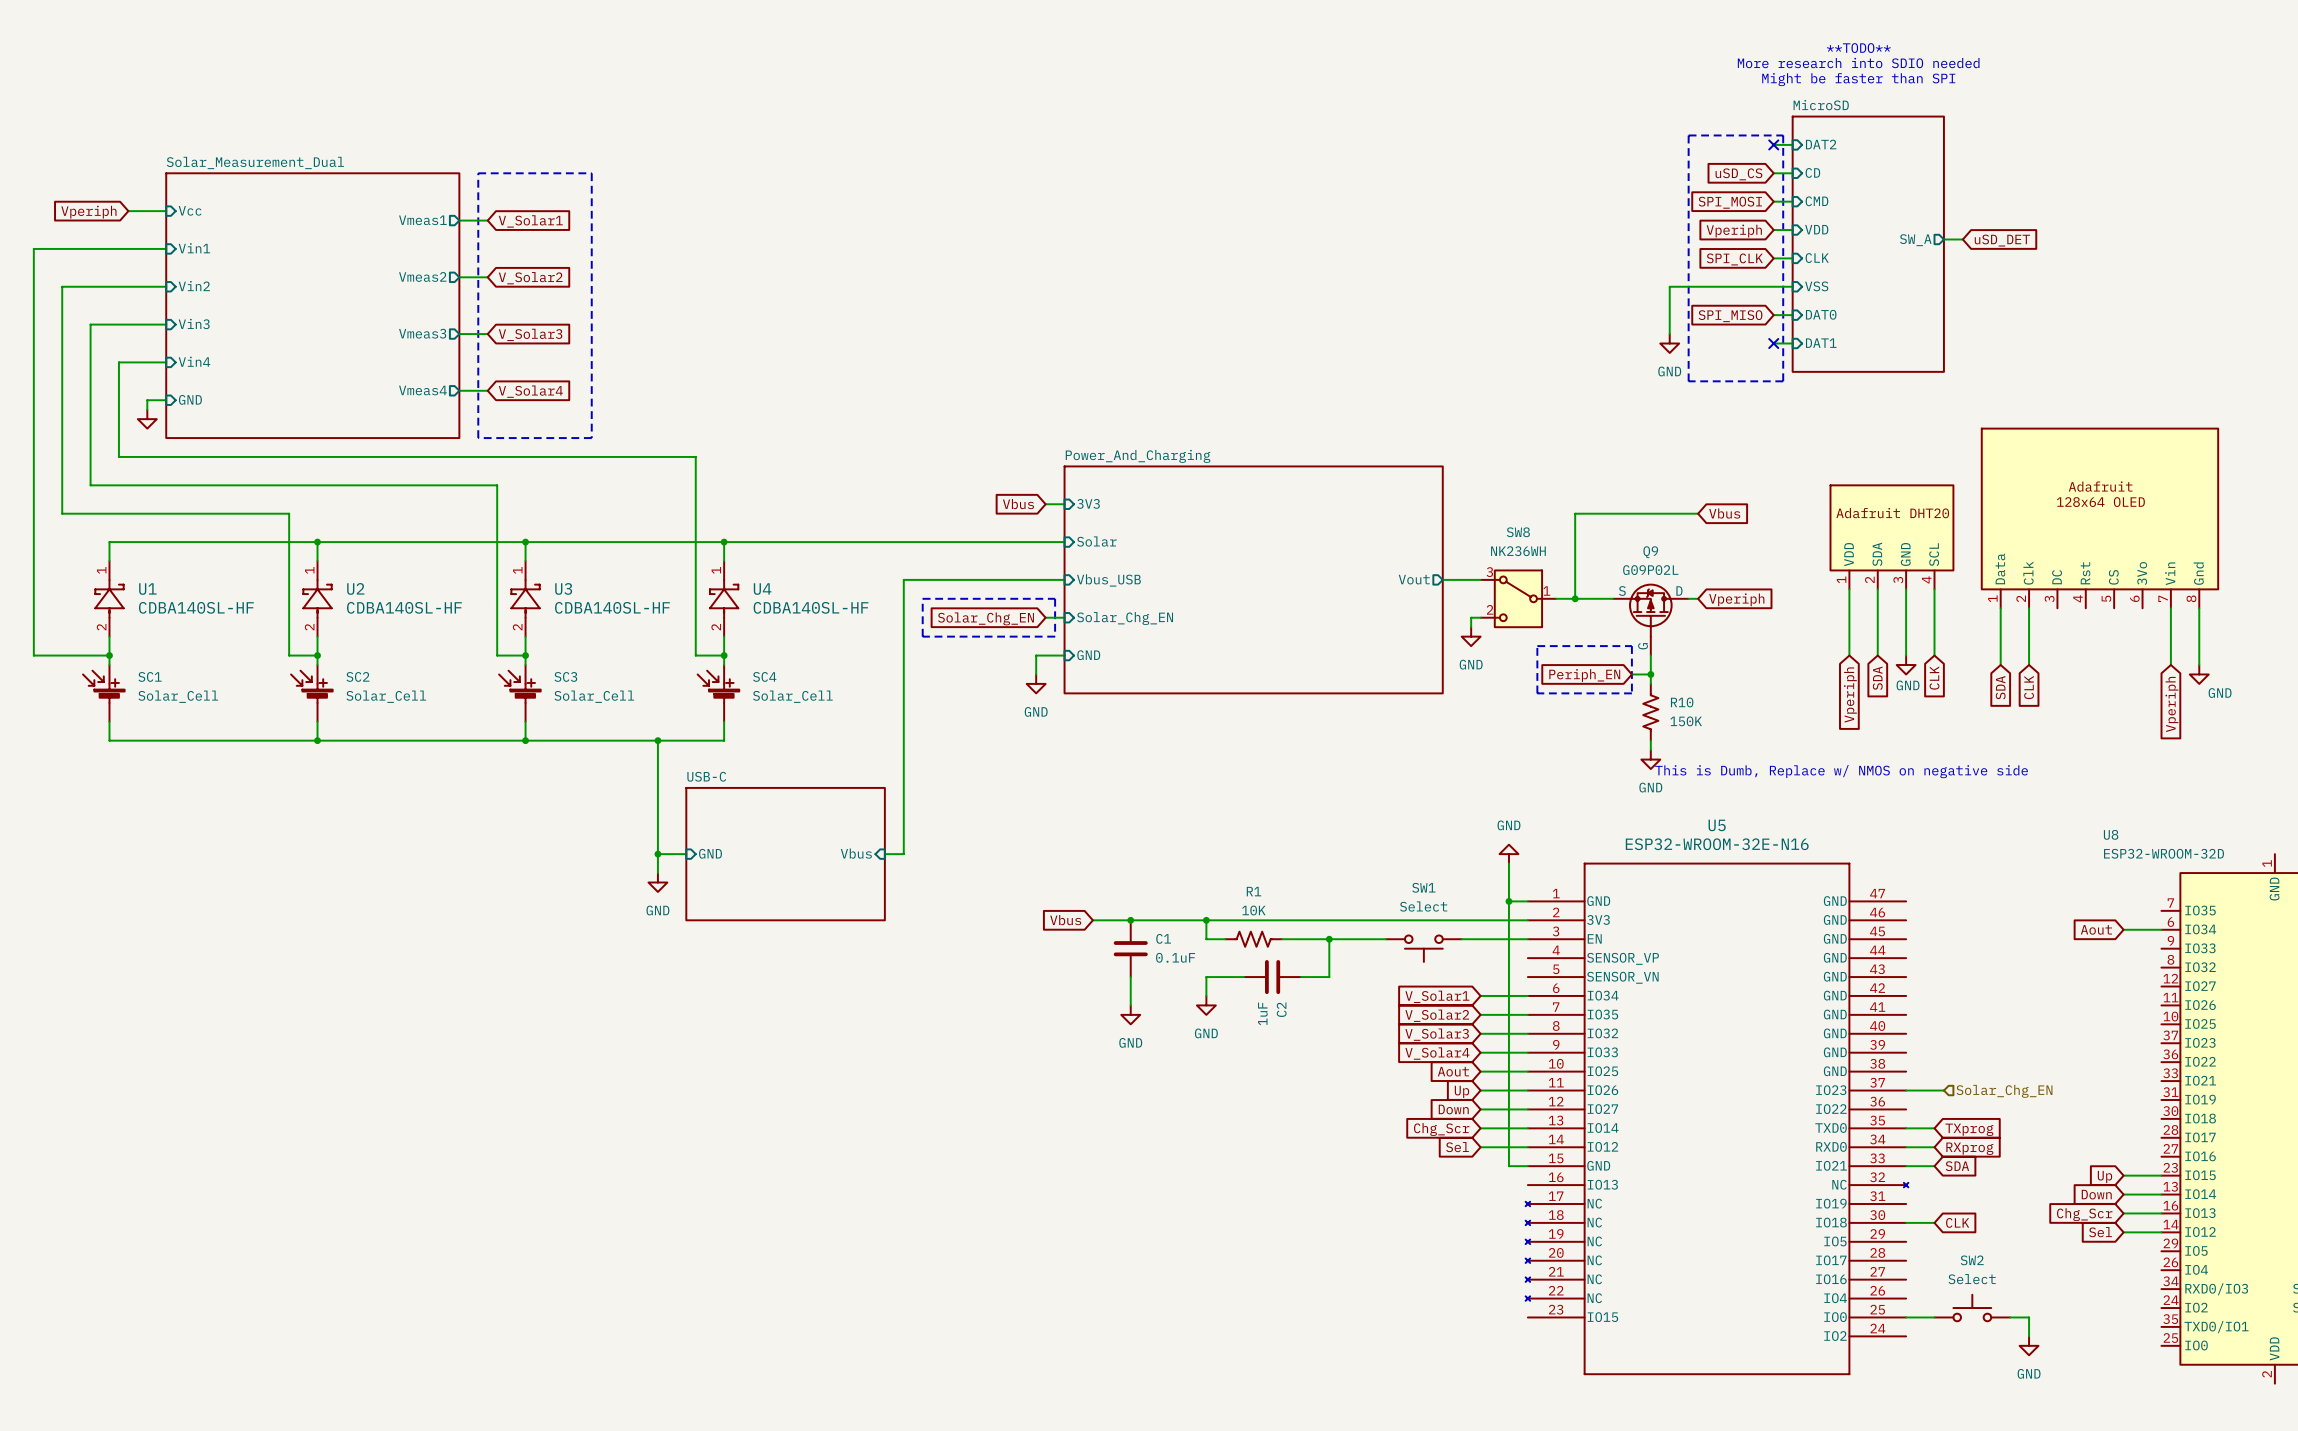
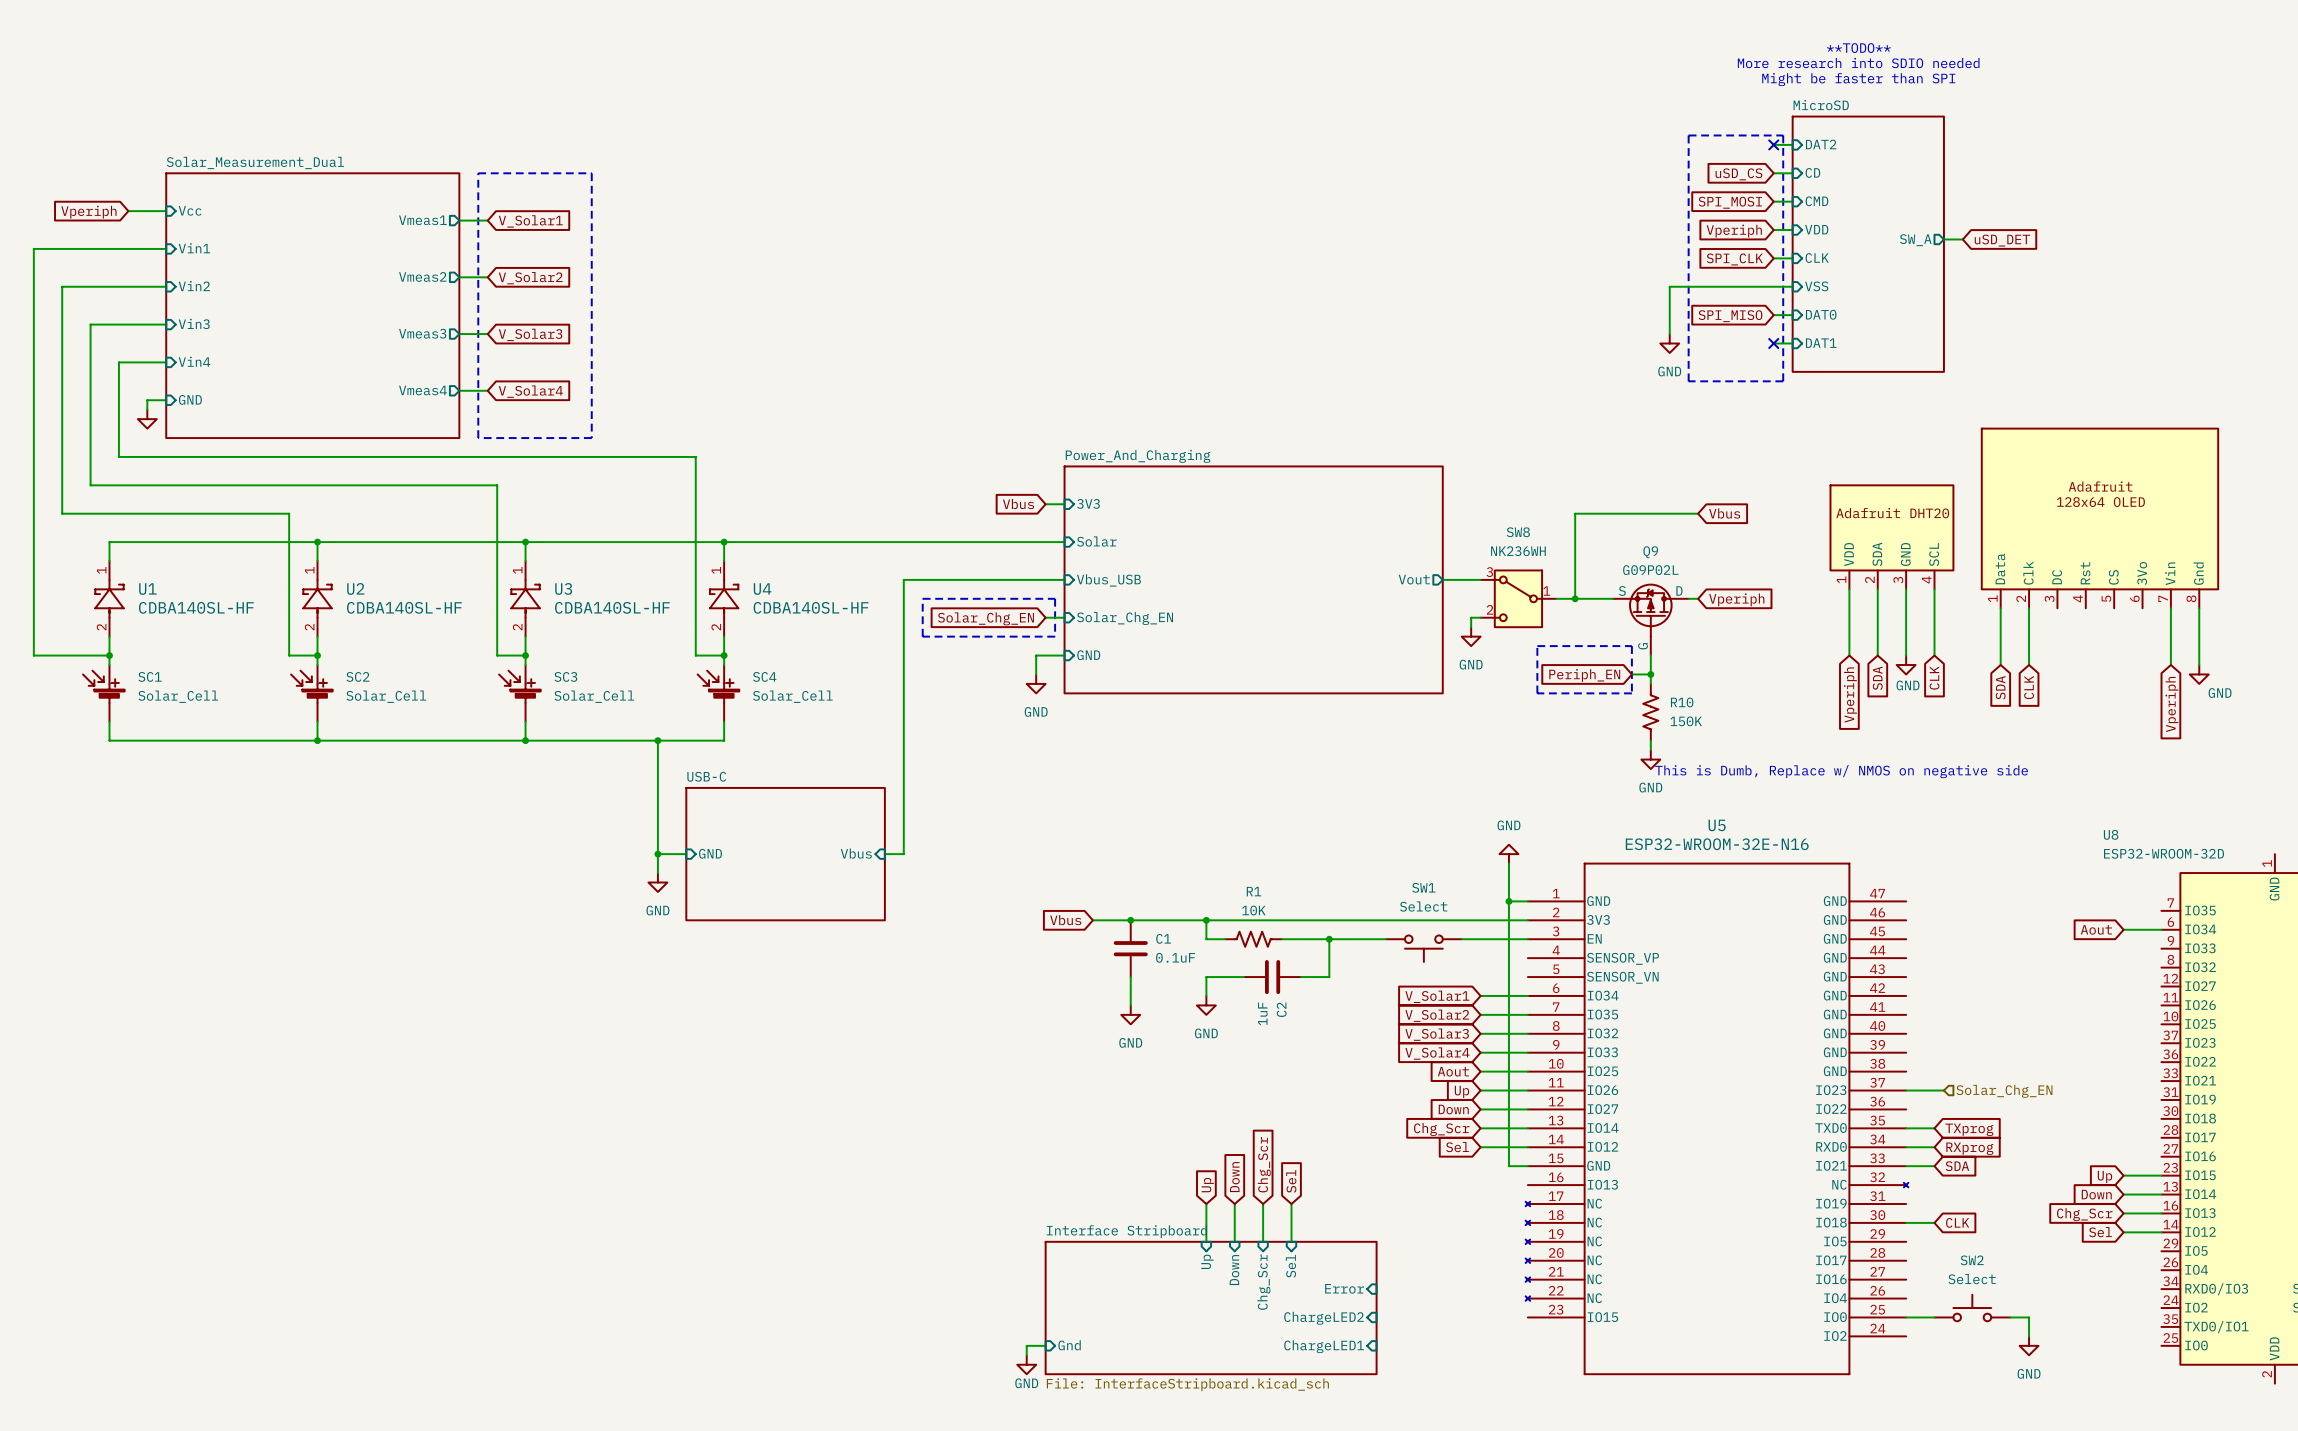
global label: none -> Chg_Scr (1264, 1164)
global label: none -> Down (1234, 1177)
global label: none -> Sel (1291, 1181)
global label: none -> Up (1207, 1185)
wire: none -> (1206, 1204) (1206, 1241)
wire: none -> (1234, 1204) (1234, 1241)
wire: none -> (1263, 1204) (1263, 1241)
wire: none -> (1291, 1204) (1291, 1241)
sheet pin: none -> Up (1207, 1261)
sheet pin: none -> Sel (1290, 1266)
sheet pin: none -> Down (1234, 1270)
sheet pin: none -> Chg_Scr (1263, 1282)
sheet pin: none -> Error (1344, 1288)
sheet Interface Stripboard: none -> File: InterfaceStripboard.kicad_sch (1211, 1308)
sheet pin: none -> ChargeLED2 (1323, 1318)
wire: none -> (1045, 1345) (1026, 1345) (1026, 1355)
sheet pin: none -> Gnd (1069, 1345)
sheet pin: none -> ChargeLED1 (1324, 1346)
power symbol: none -> GND (1026, 1364)

